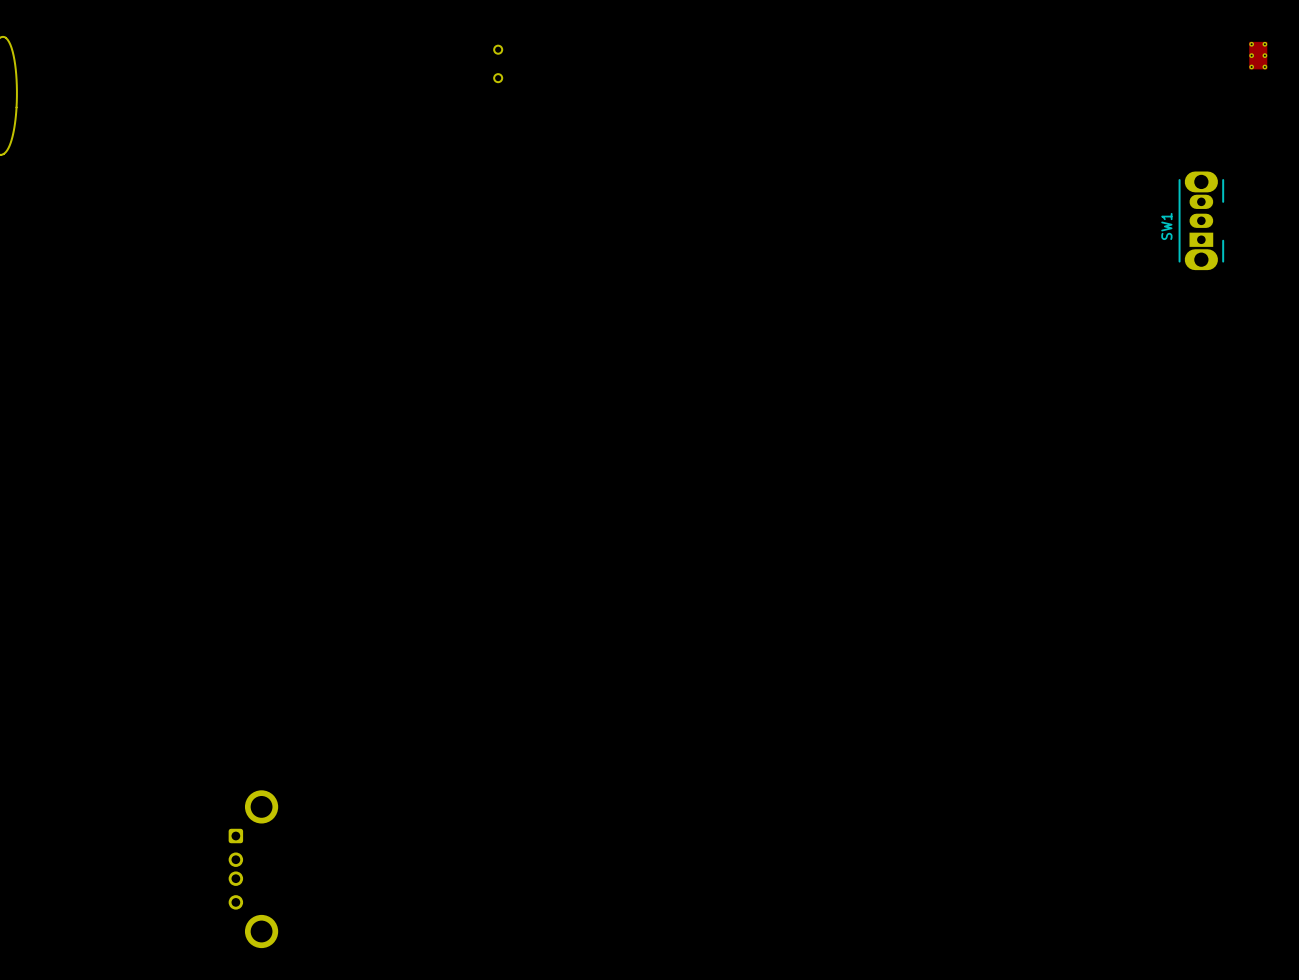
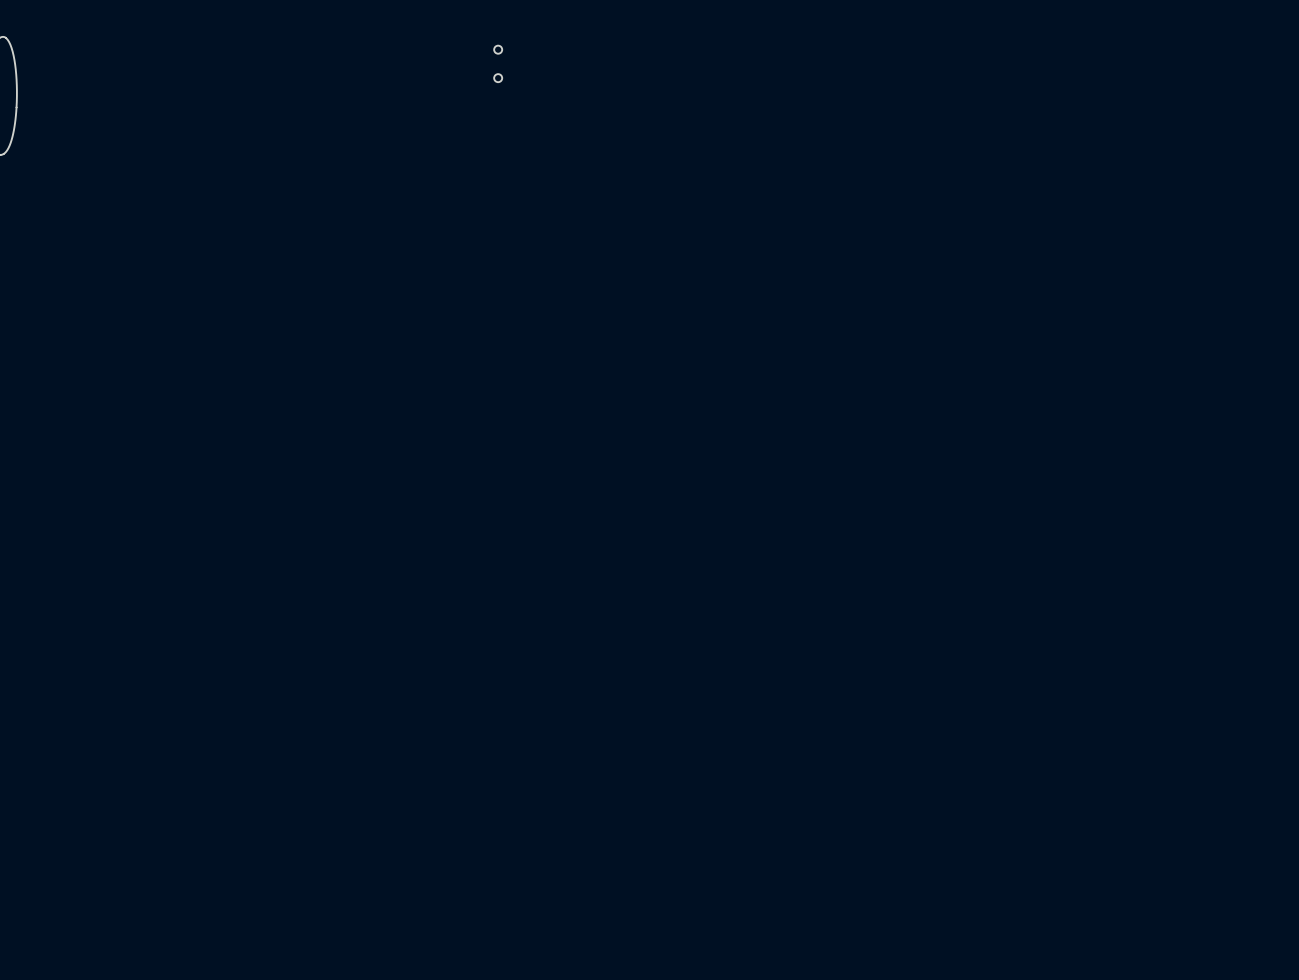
part: (1258, 55) -> none
SW1: (1201, 220) -> none
part: (253, 869) -> none

